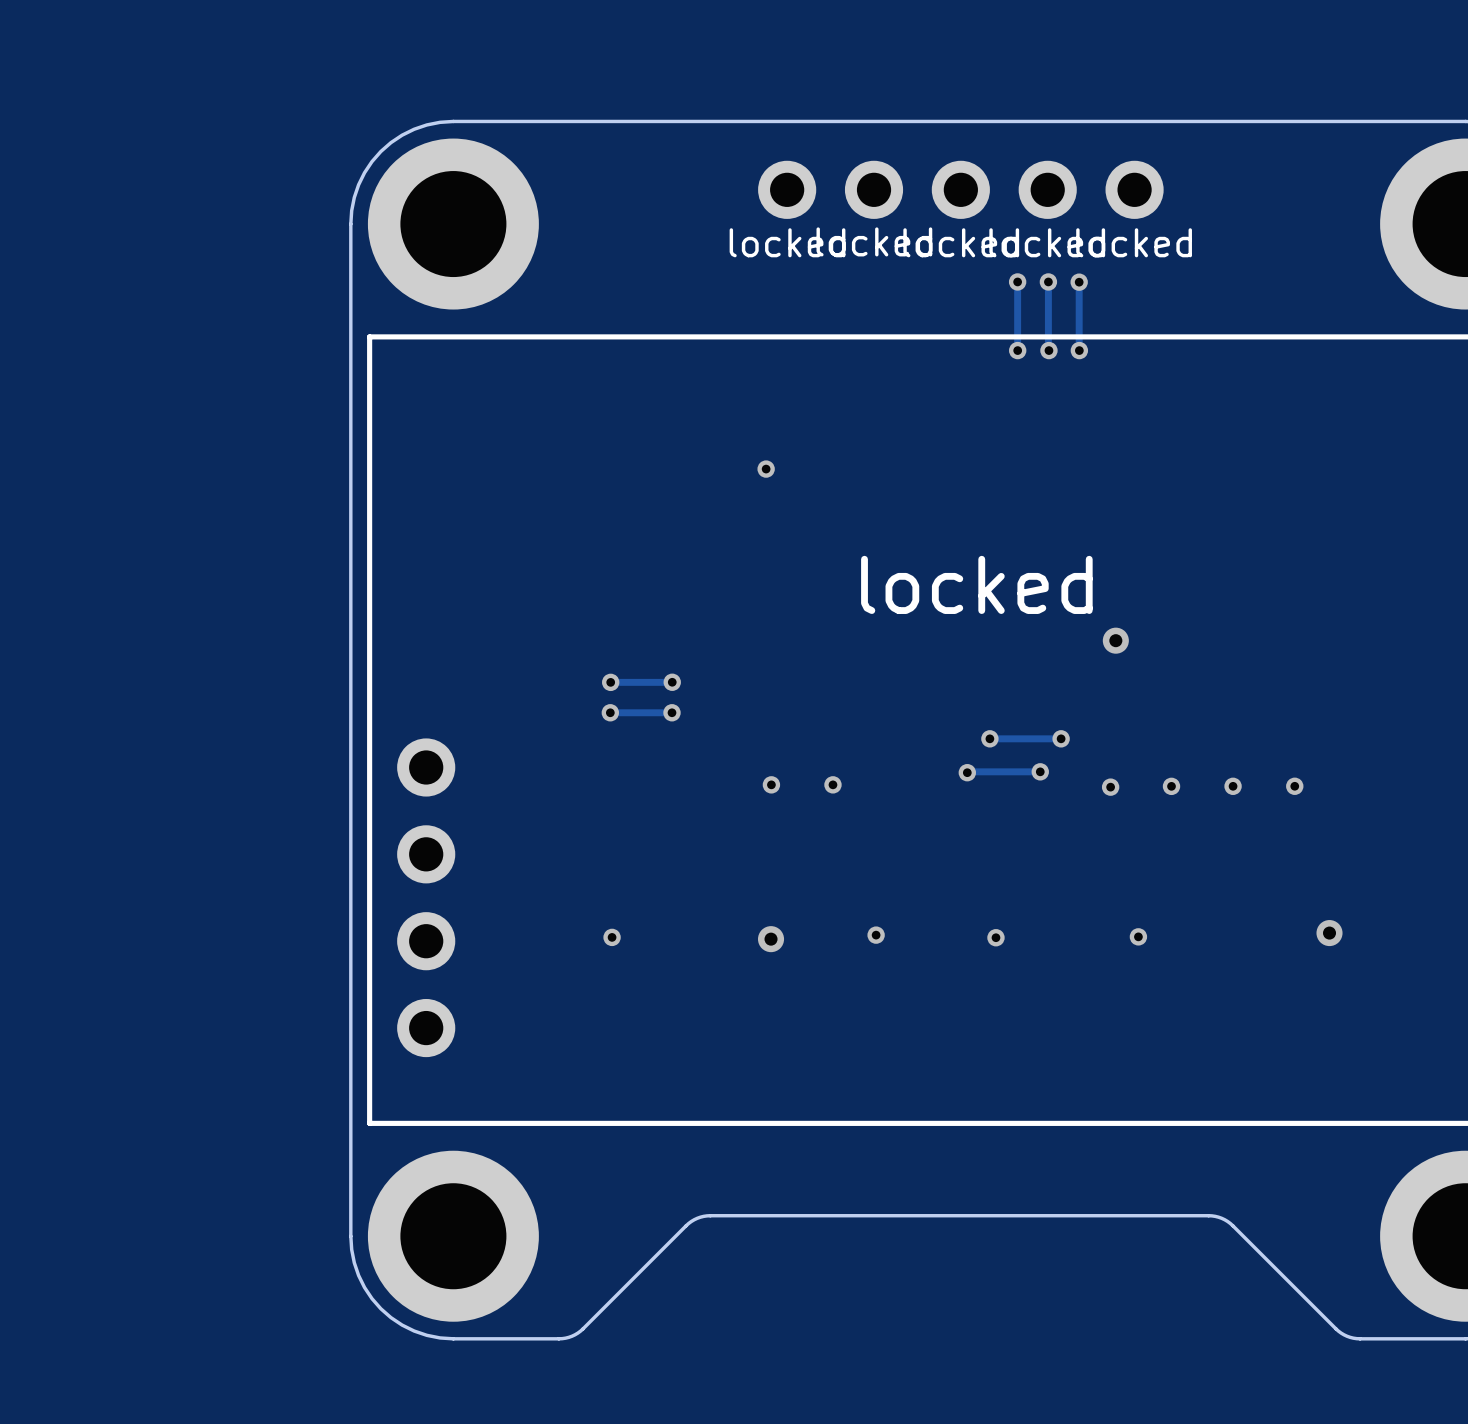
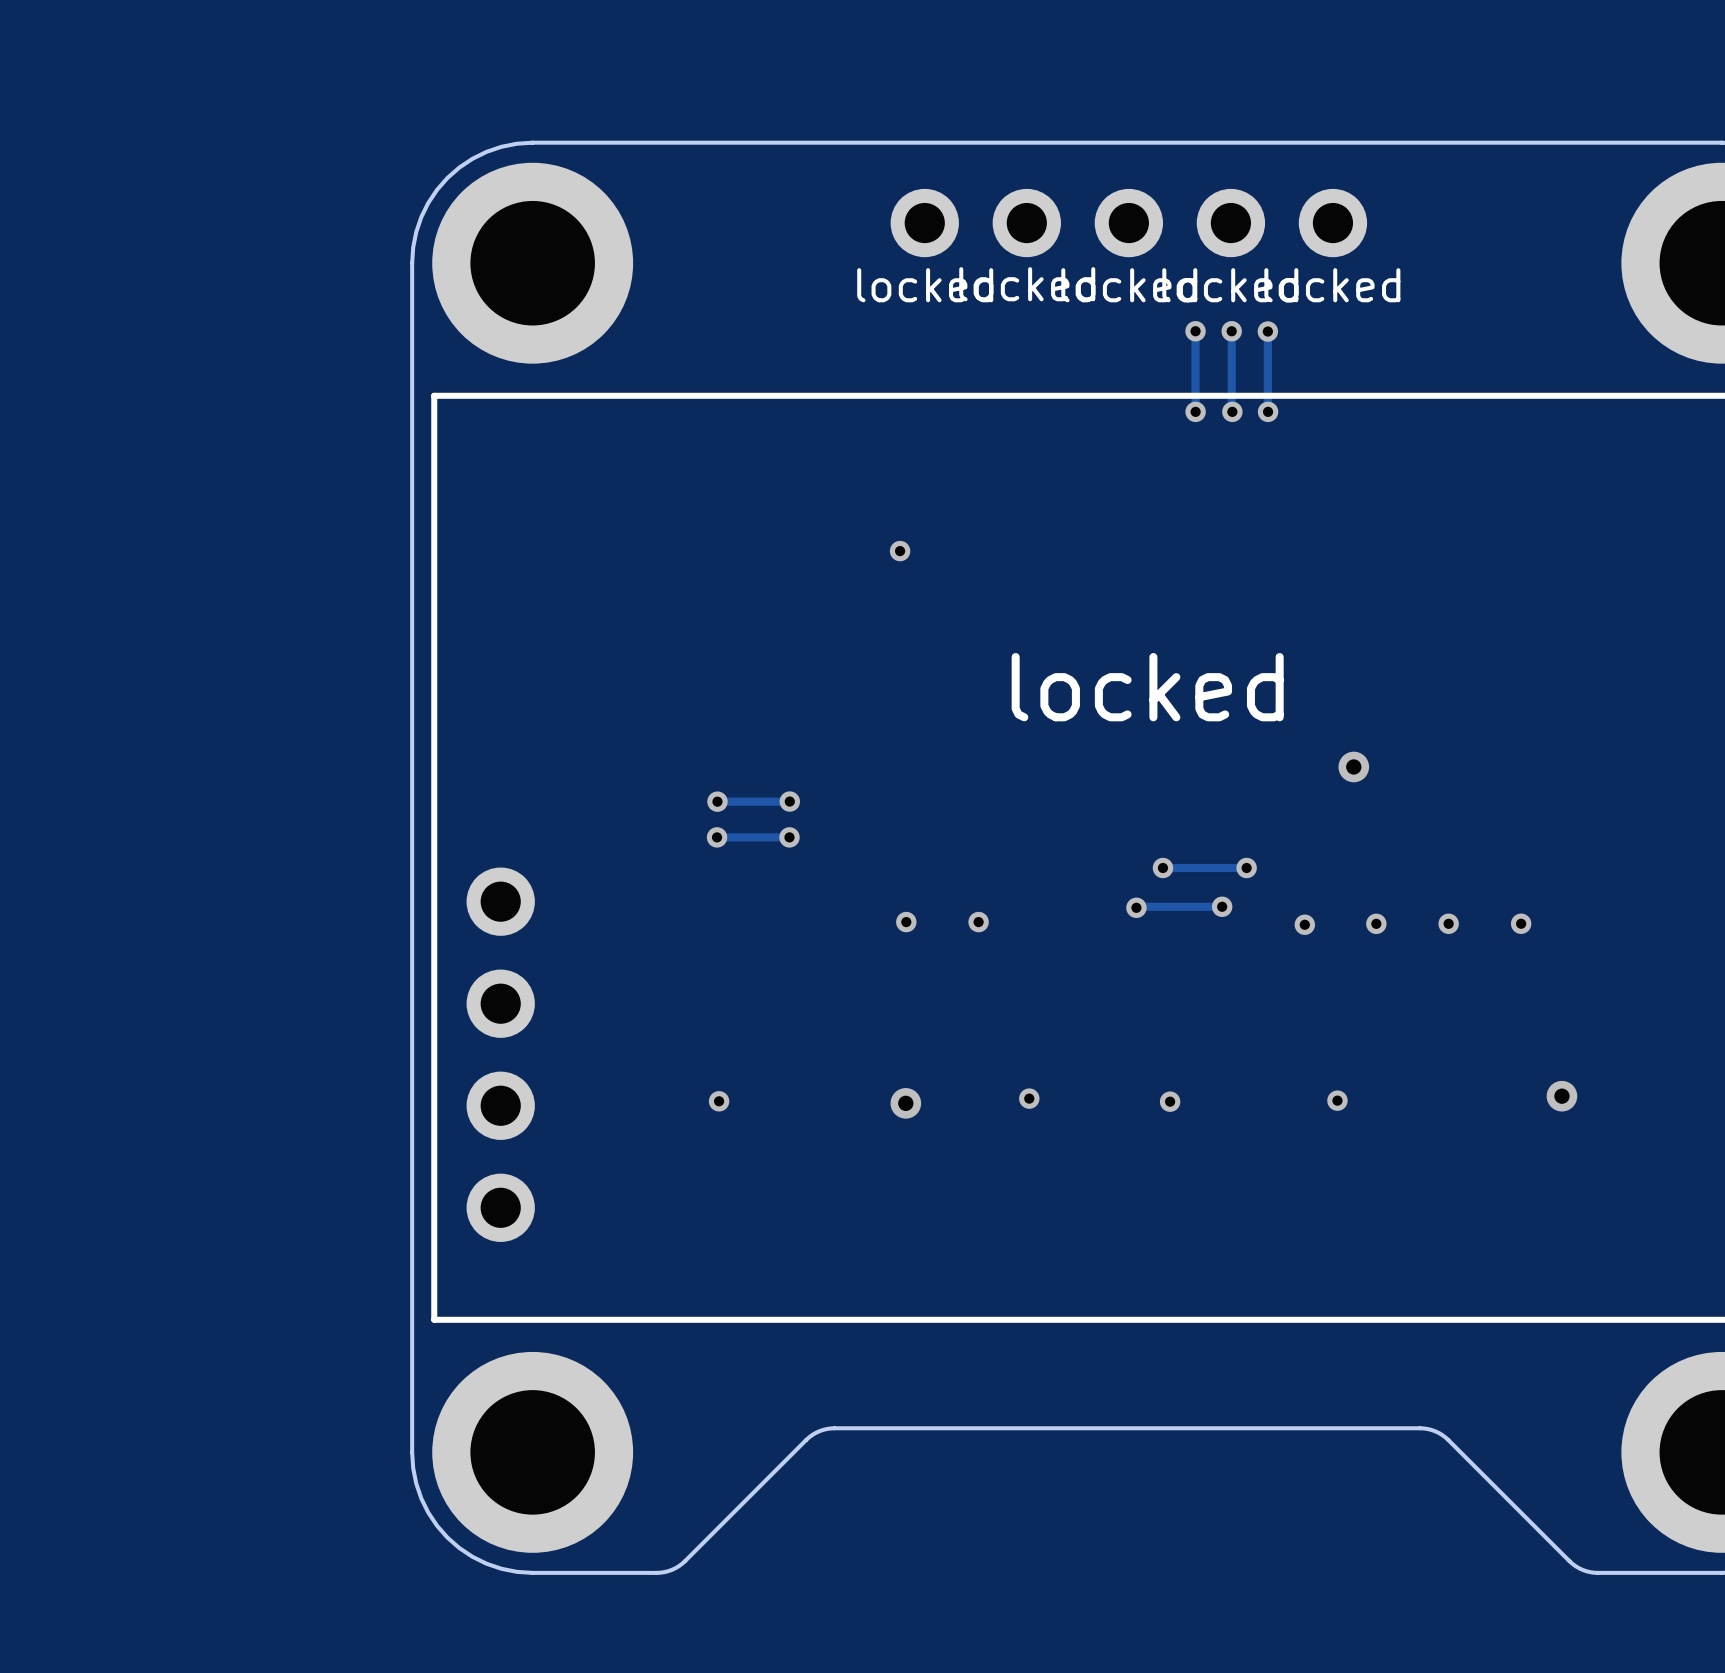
via position: (1115, 640) -> (1353, 766)

